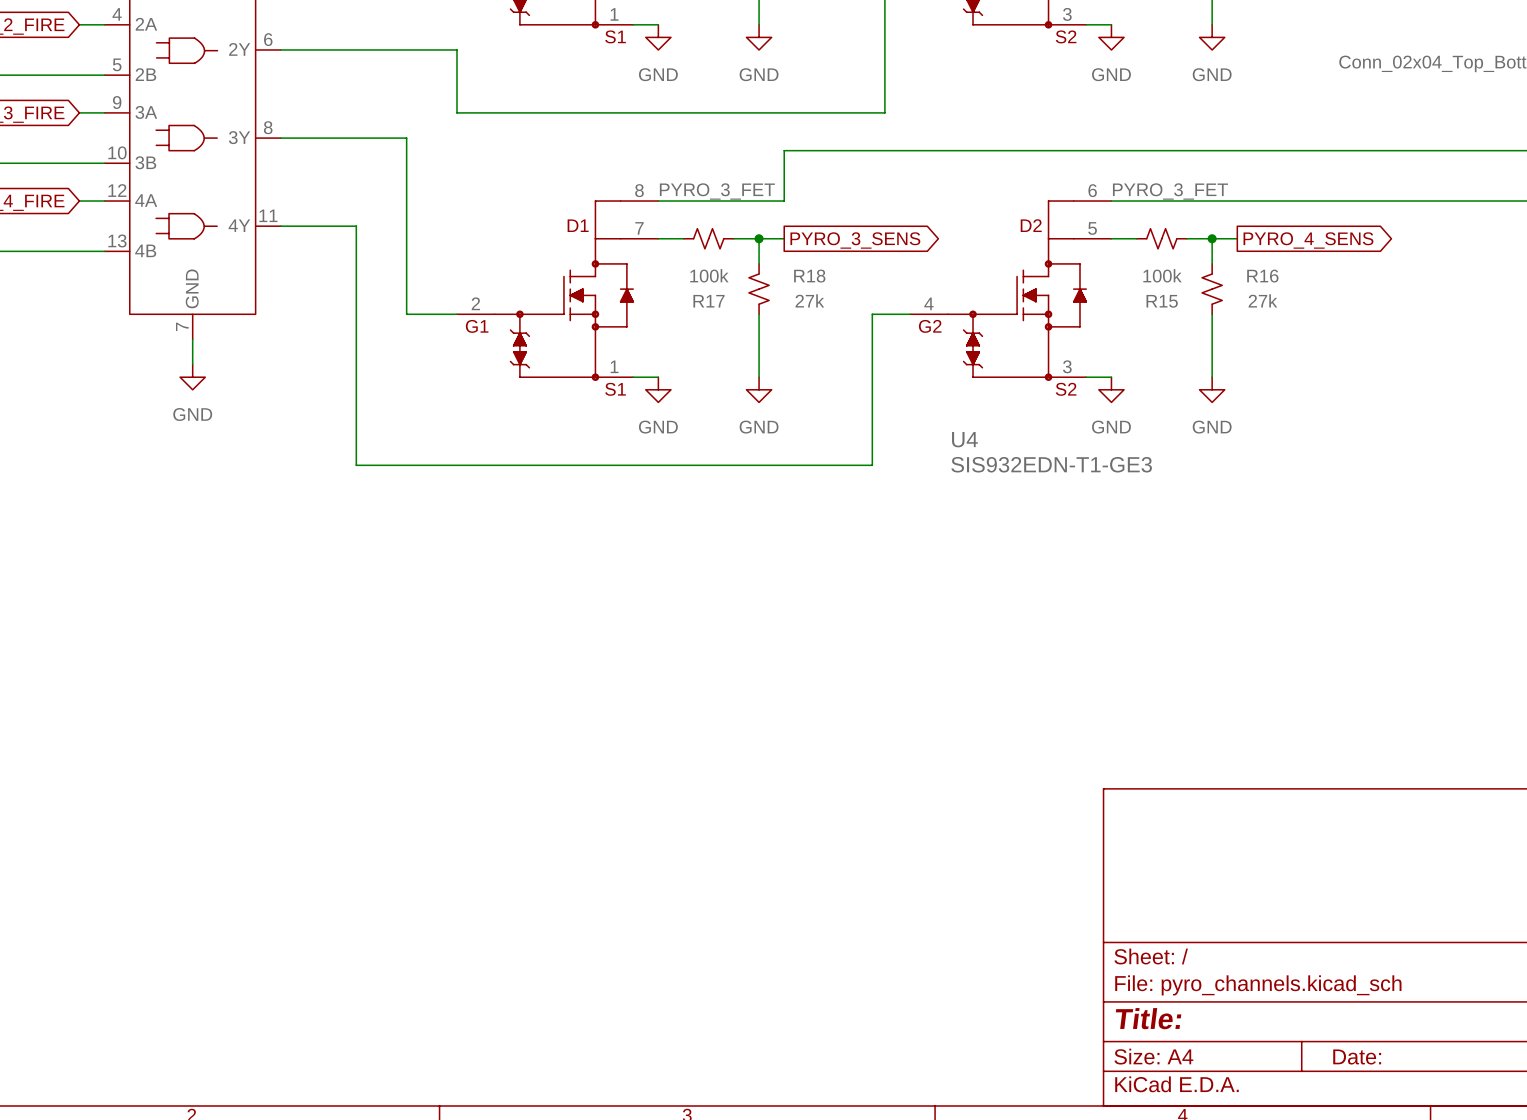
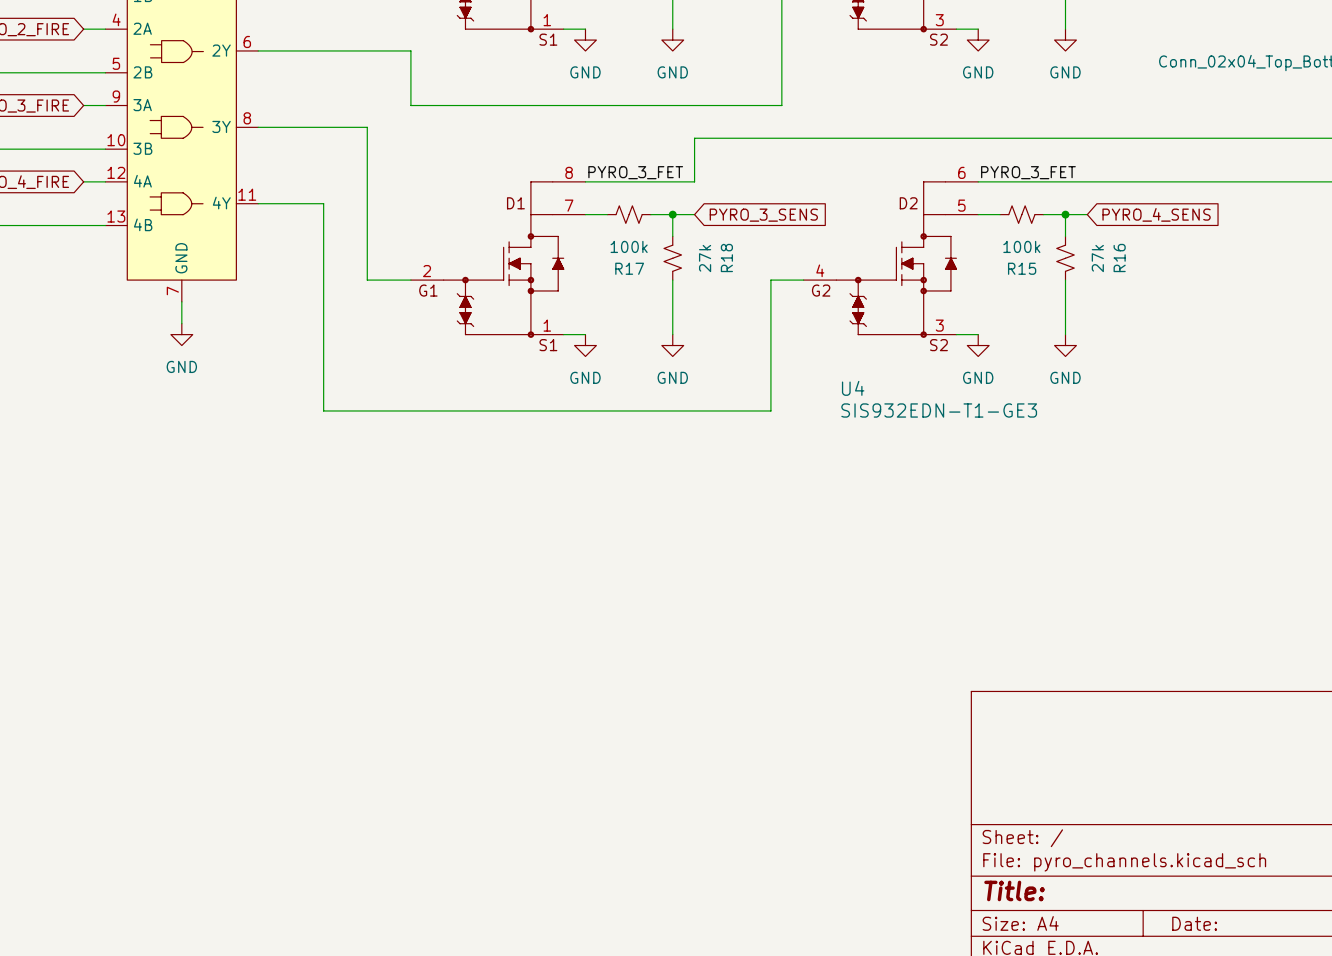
global label shape: output (855, 240) -> input (763, 215)
global label shape: output (1308, 240) -> input (1156, 214)
R18 name rotation: 0° (809, 276) -> 90° counterclockwise (726, 257)
R16 name rotation: 0° (1262, 276) -> 90° counterclockwise (1119, 257)
R18 value rotation: 0° (809, 300) -> 90° counterclockwise (705, 258)
R16 value rotation: 0° (1262, 300) -> 90° counterclockwise (1097, 258)

